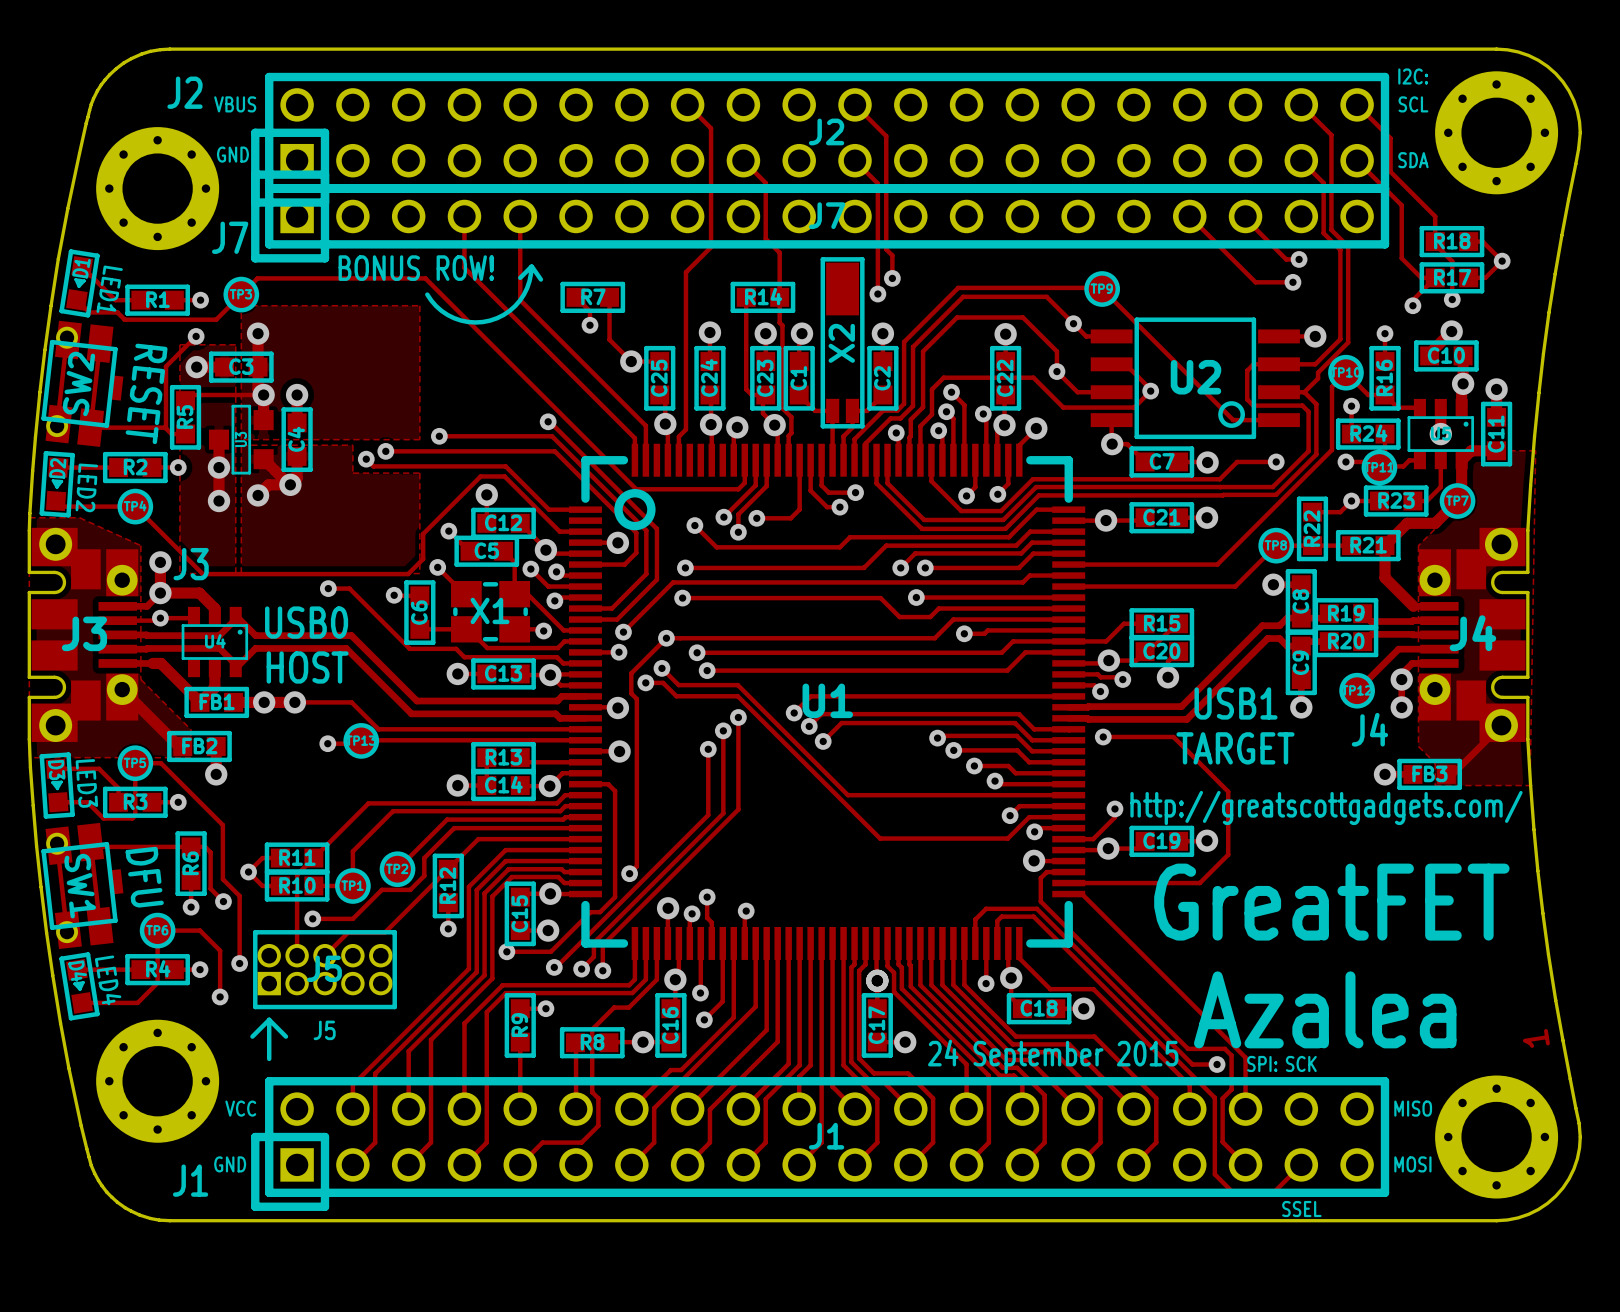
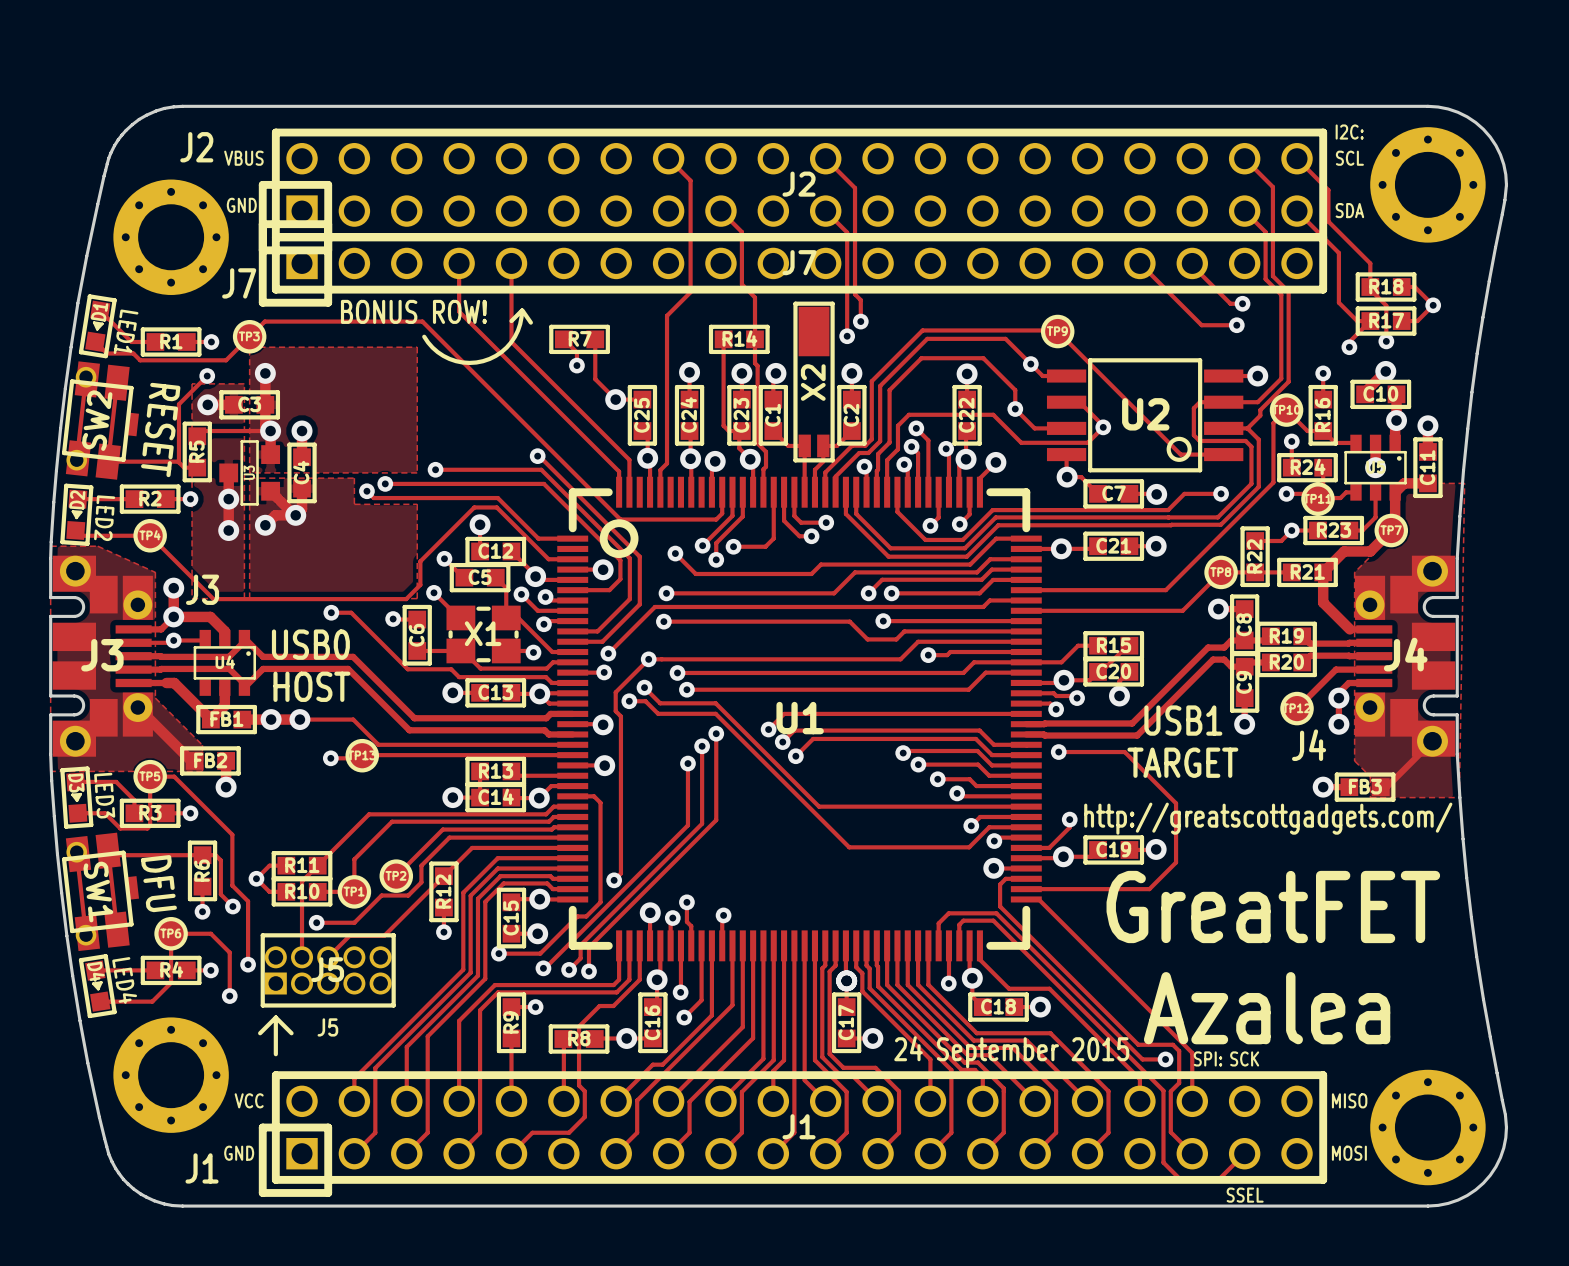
text: 1 (1536, 1038) -> none

